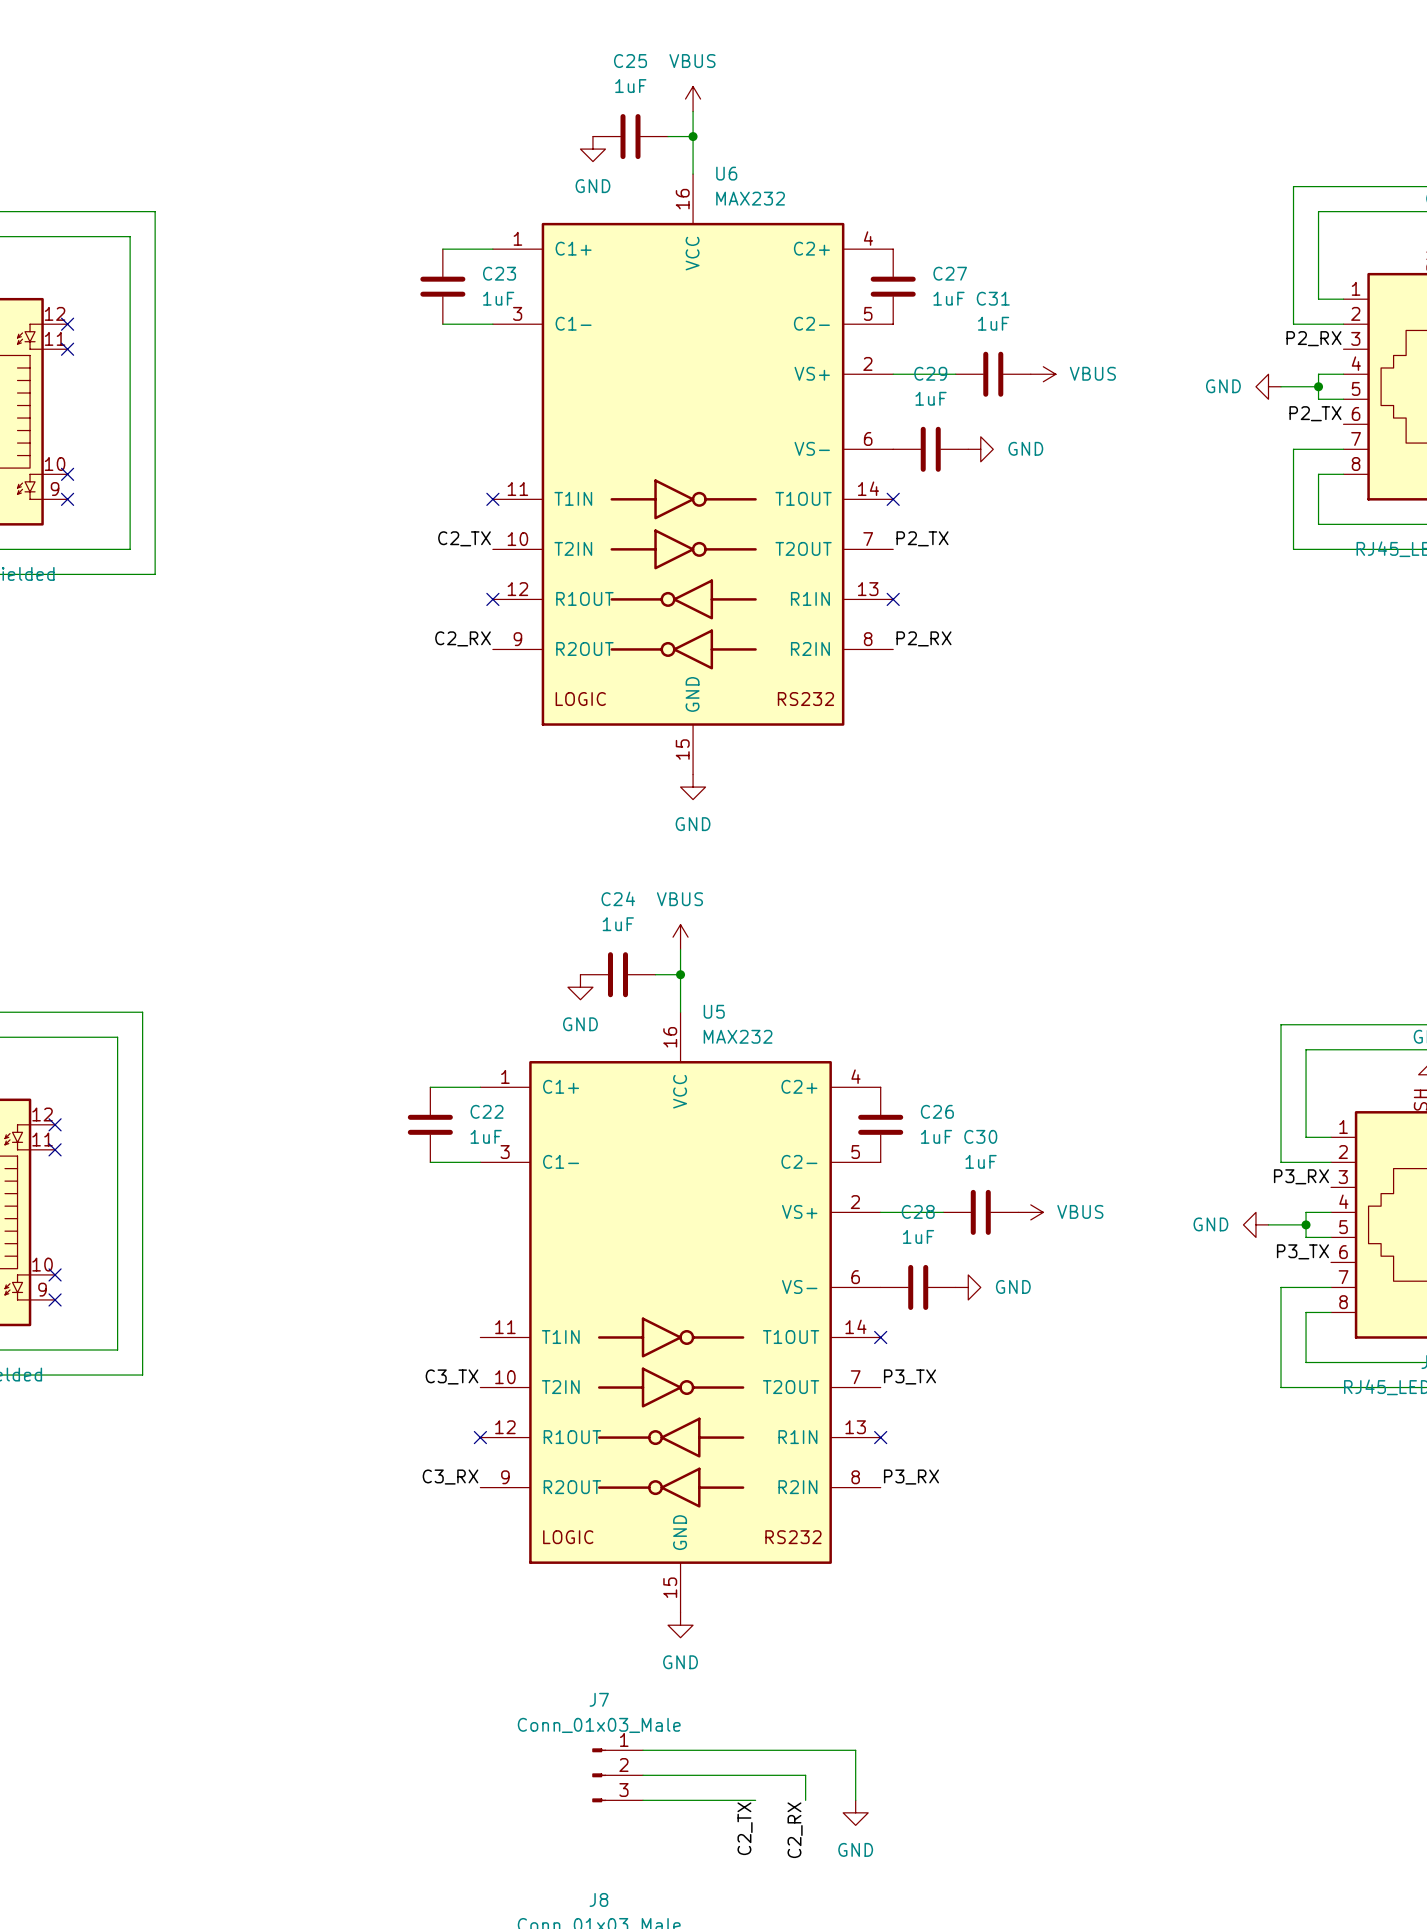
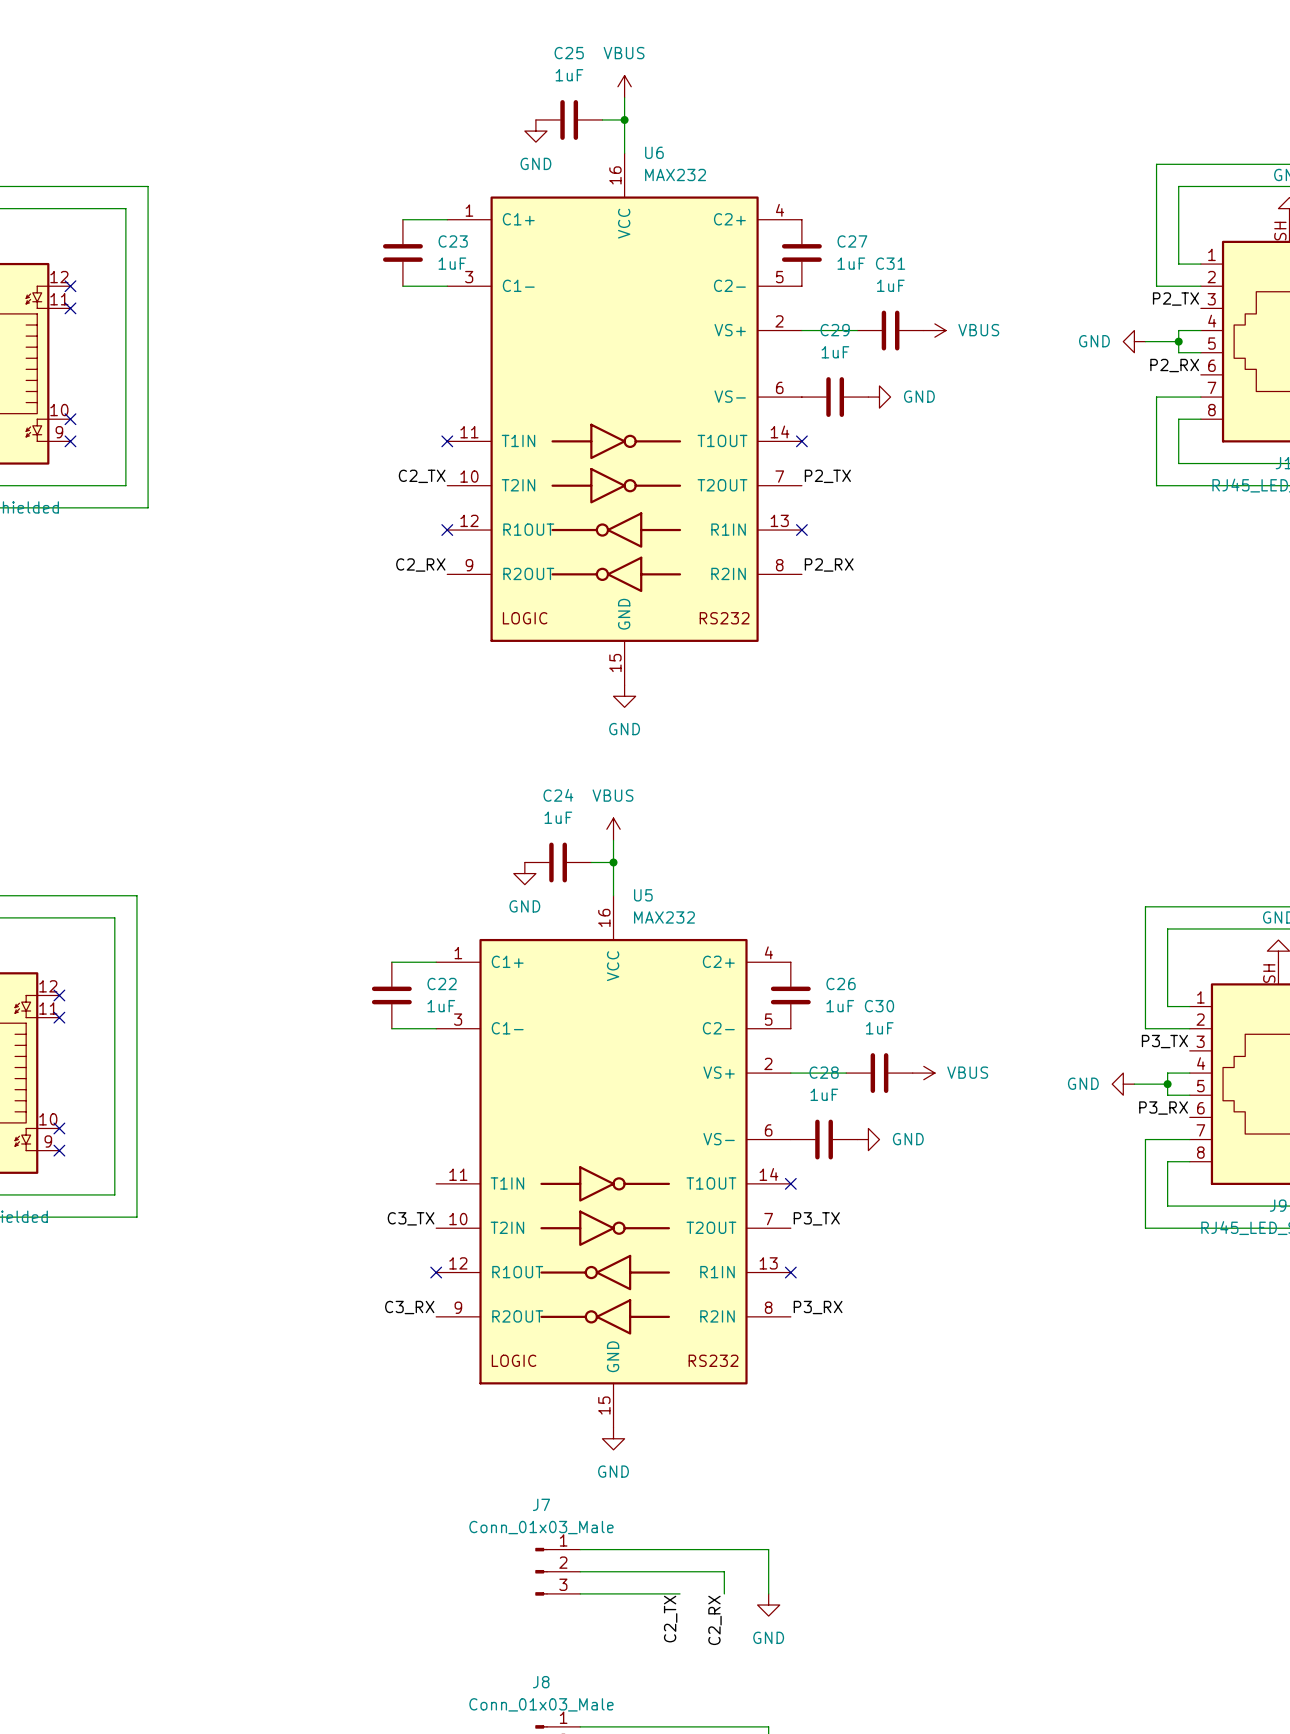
label: P2_RX (1313, 338) -> P2_TX (1175, 299)
label: P2_TX (1315, 413) -> P2_RX (1174, 365)
label: P3_RX (1301, 1176) -> P3_TX (1164, 1041)
label: P3_TX (1302, 1251) -> P3_RX (1163, 1108)

